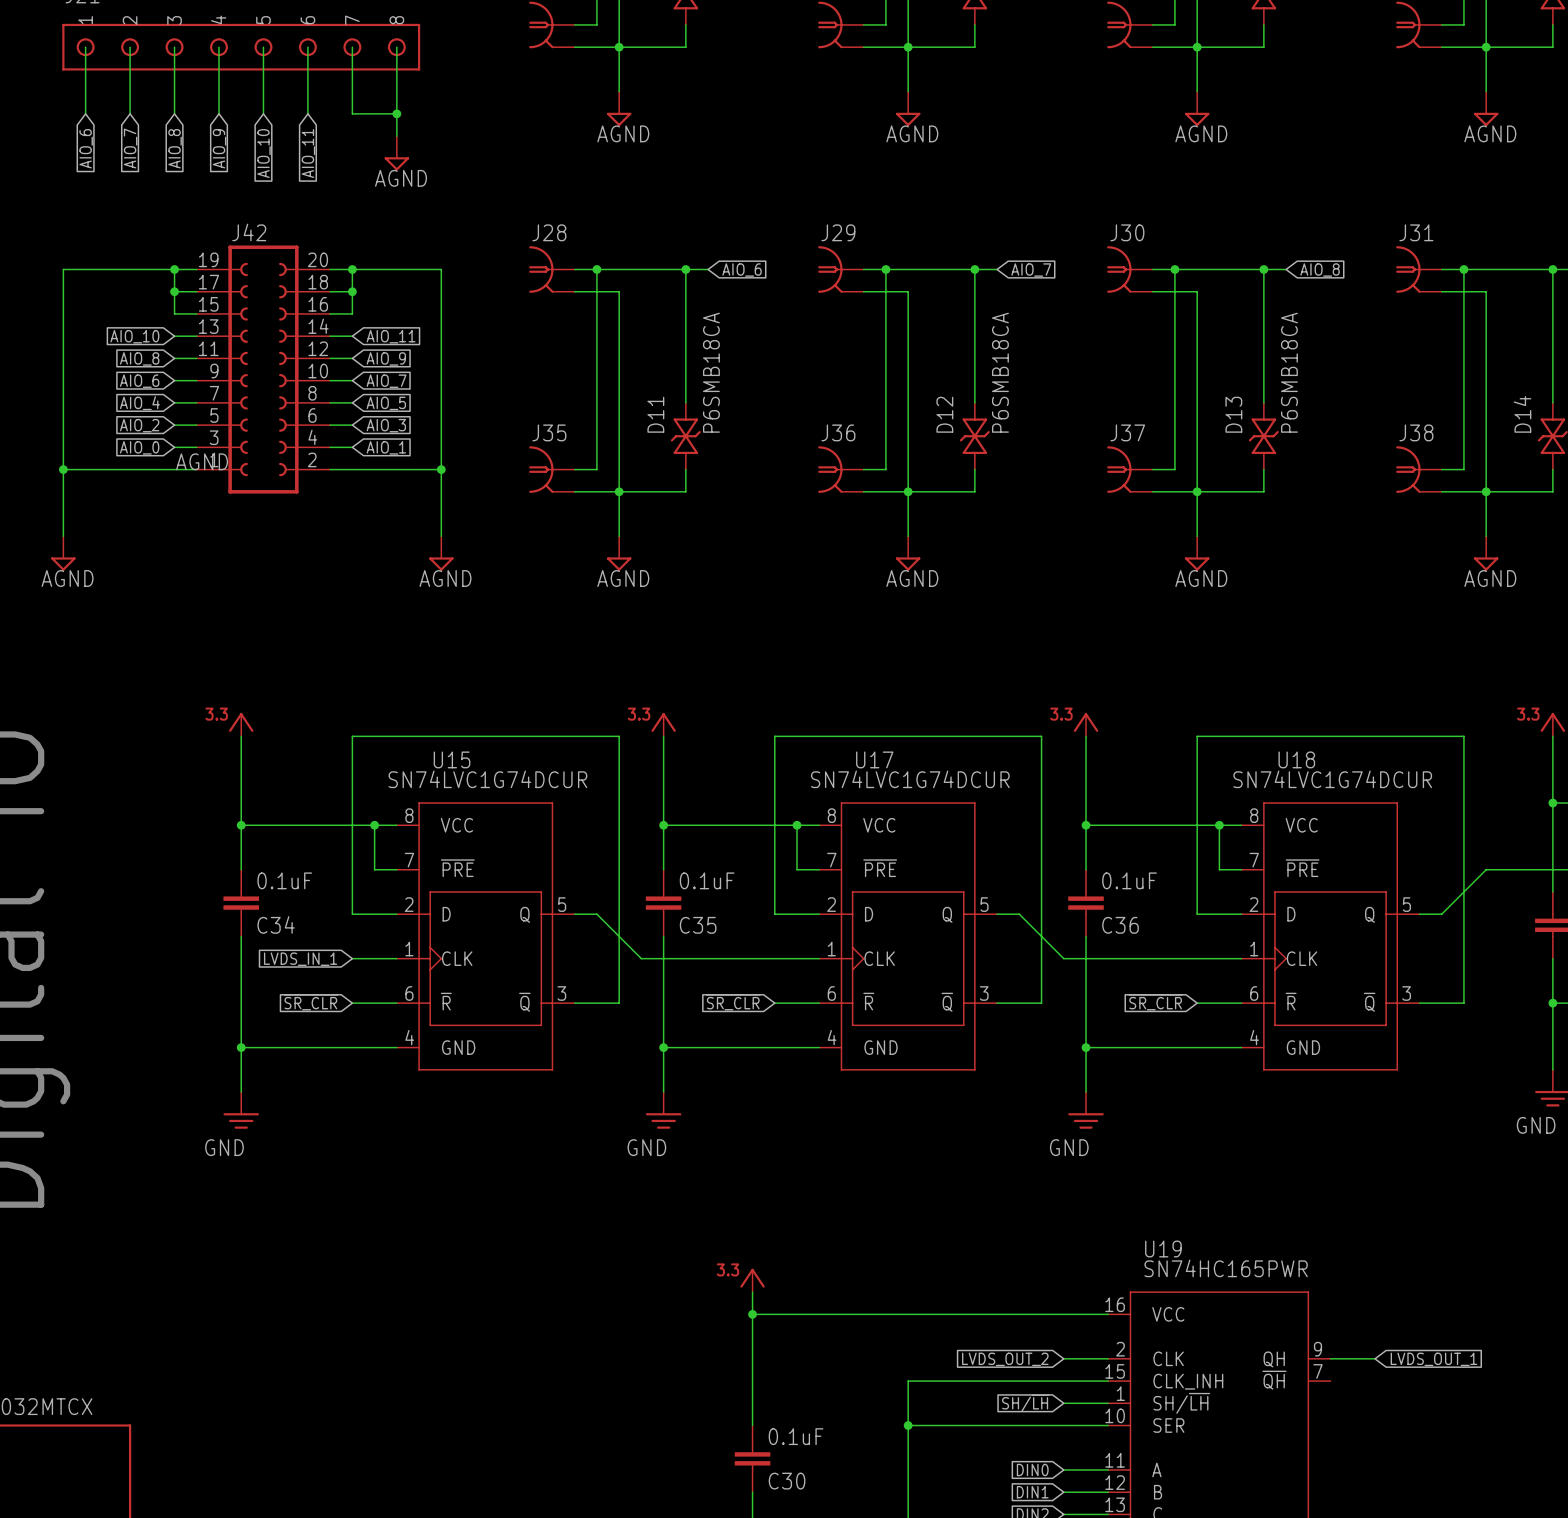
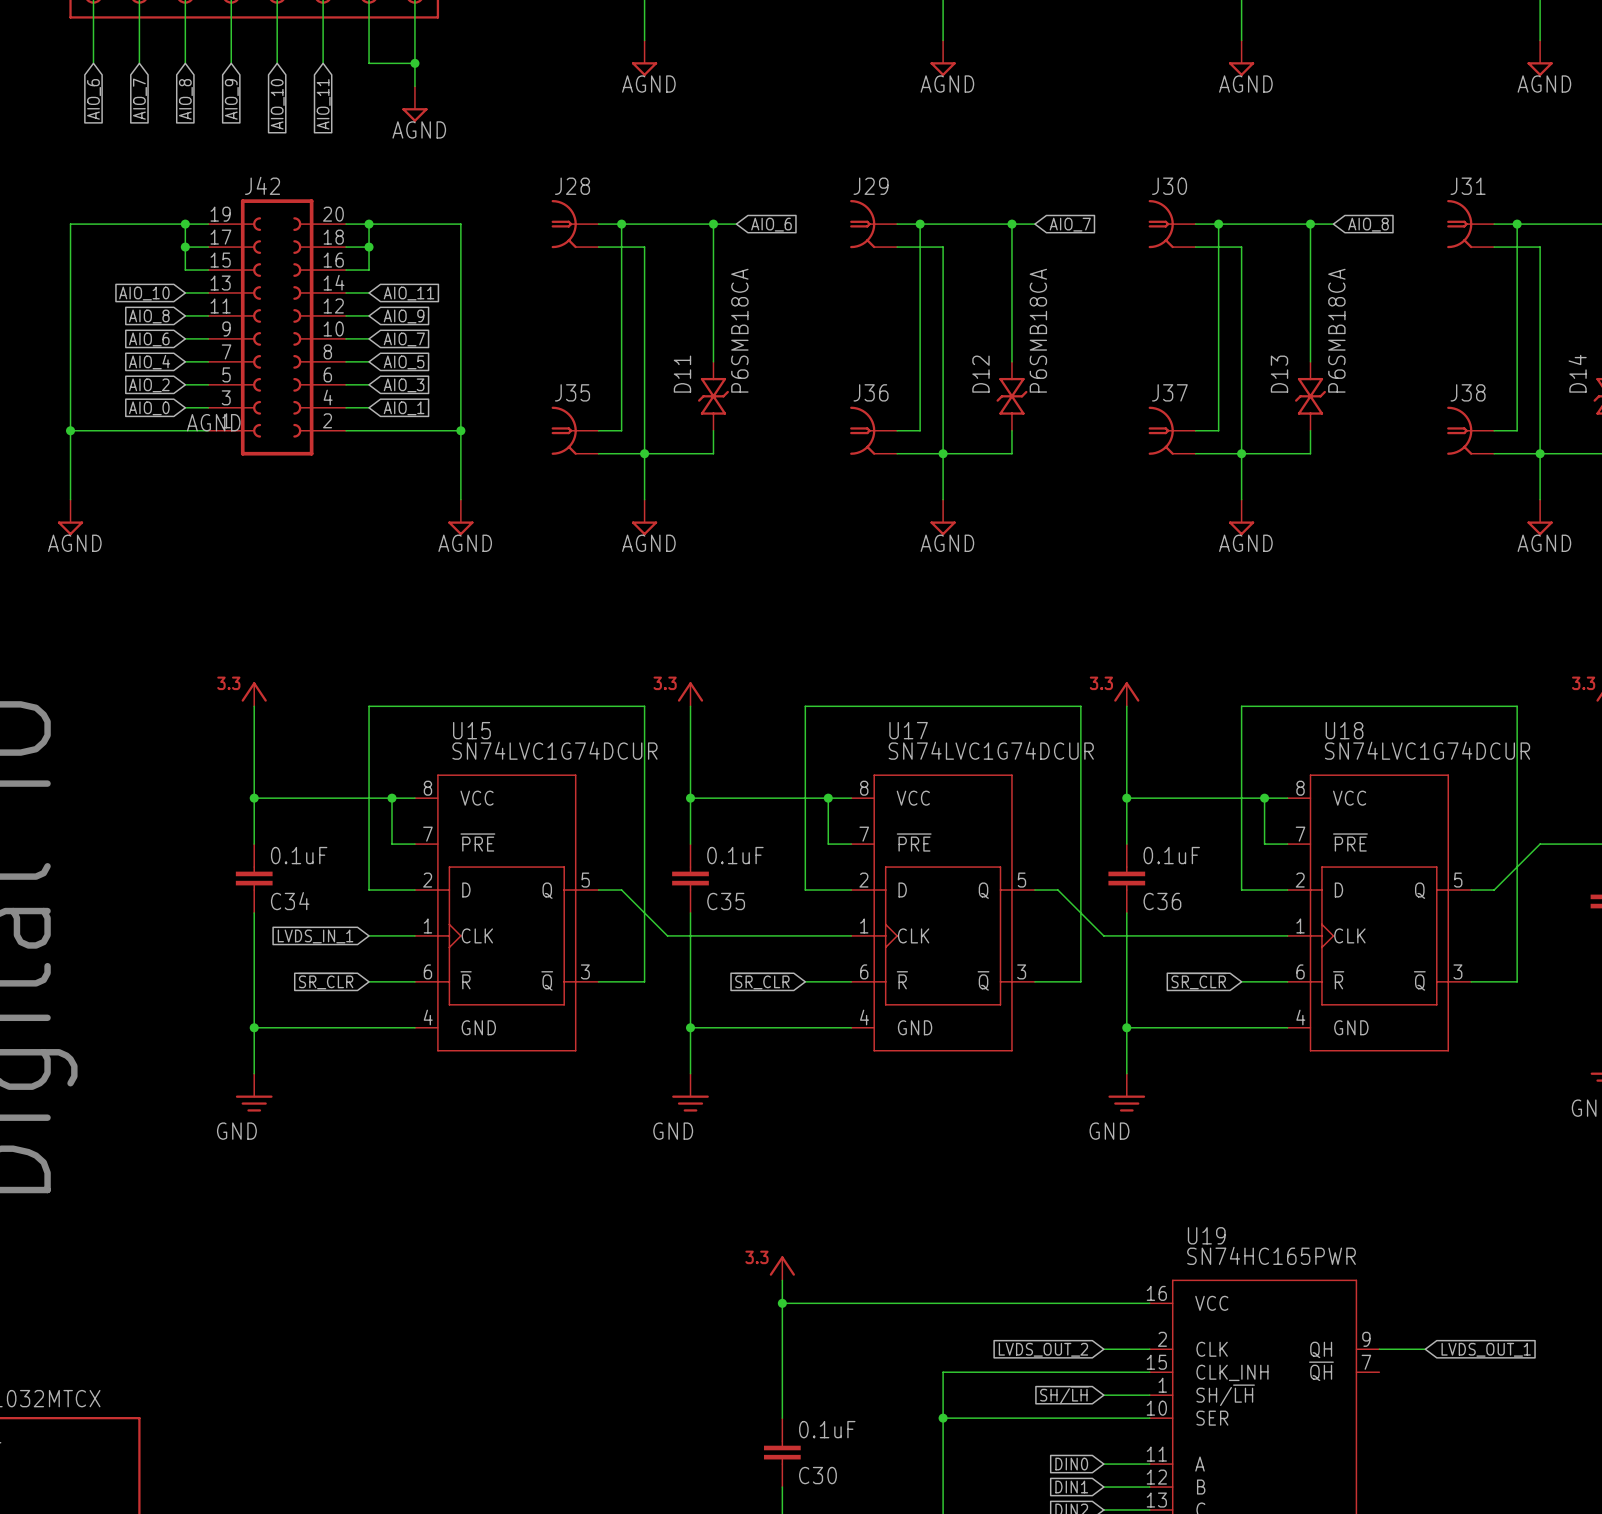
U15 value position: SN74LVC1G74DCUR (487, 779) -> SN74LVC1G74DCUR (554, 750)
U17 value position: SN74LVC1G74DCUR (910, 779) -> SN74LVC1G74DCUR (991, 750)
U18 value position: SN74LVC1G74DCUR (1332, 779) -> SN74LVC1G74DCUR (1427, 750)

